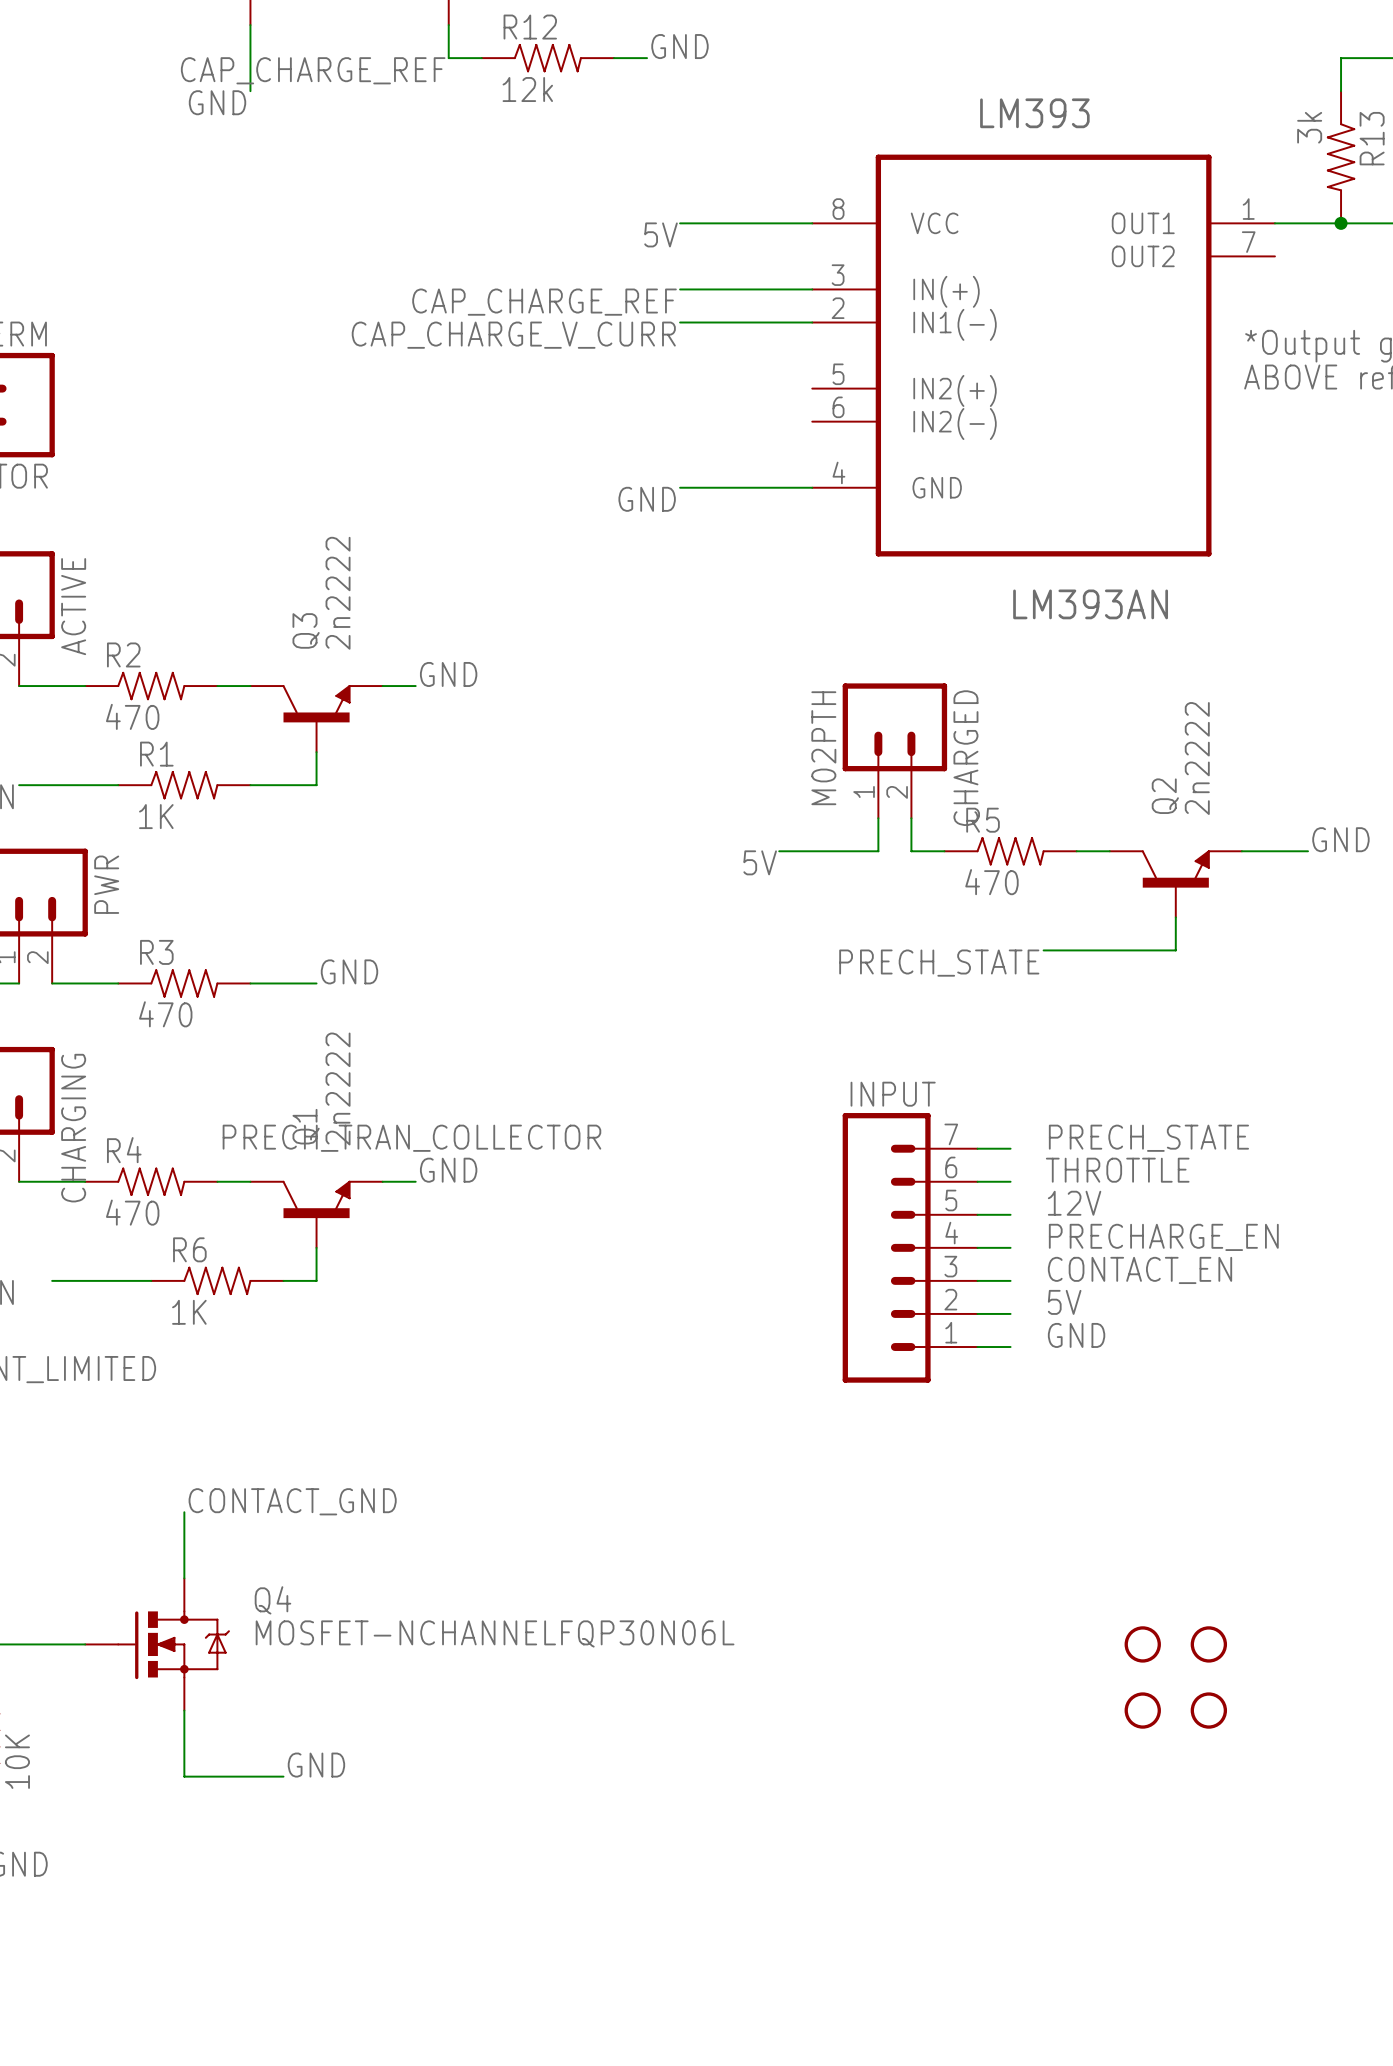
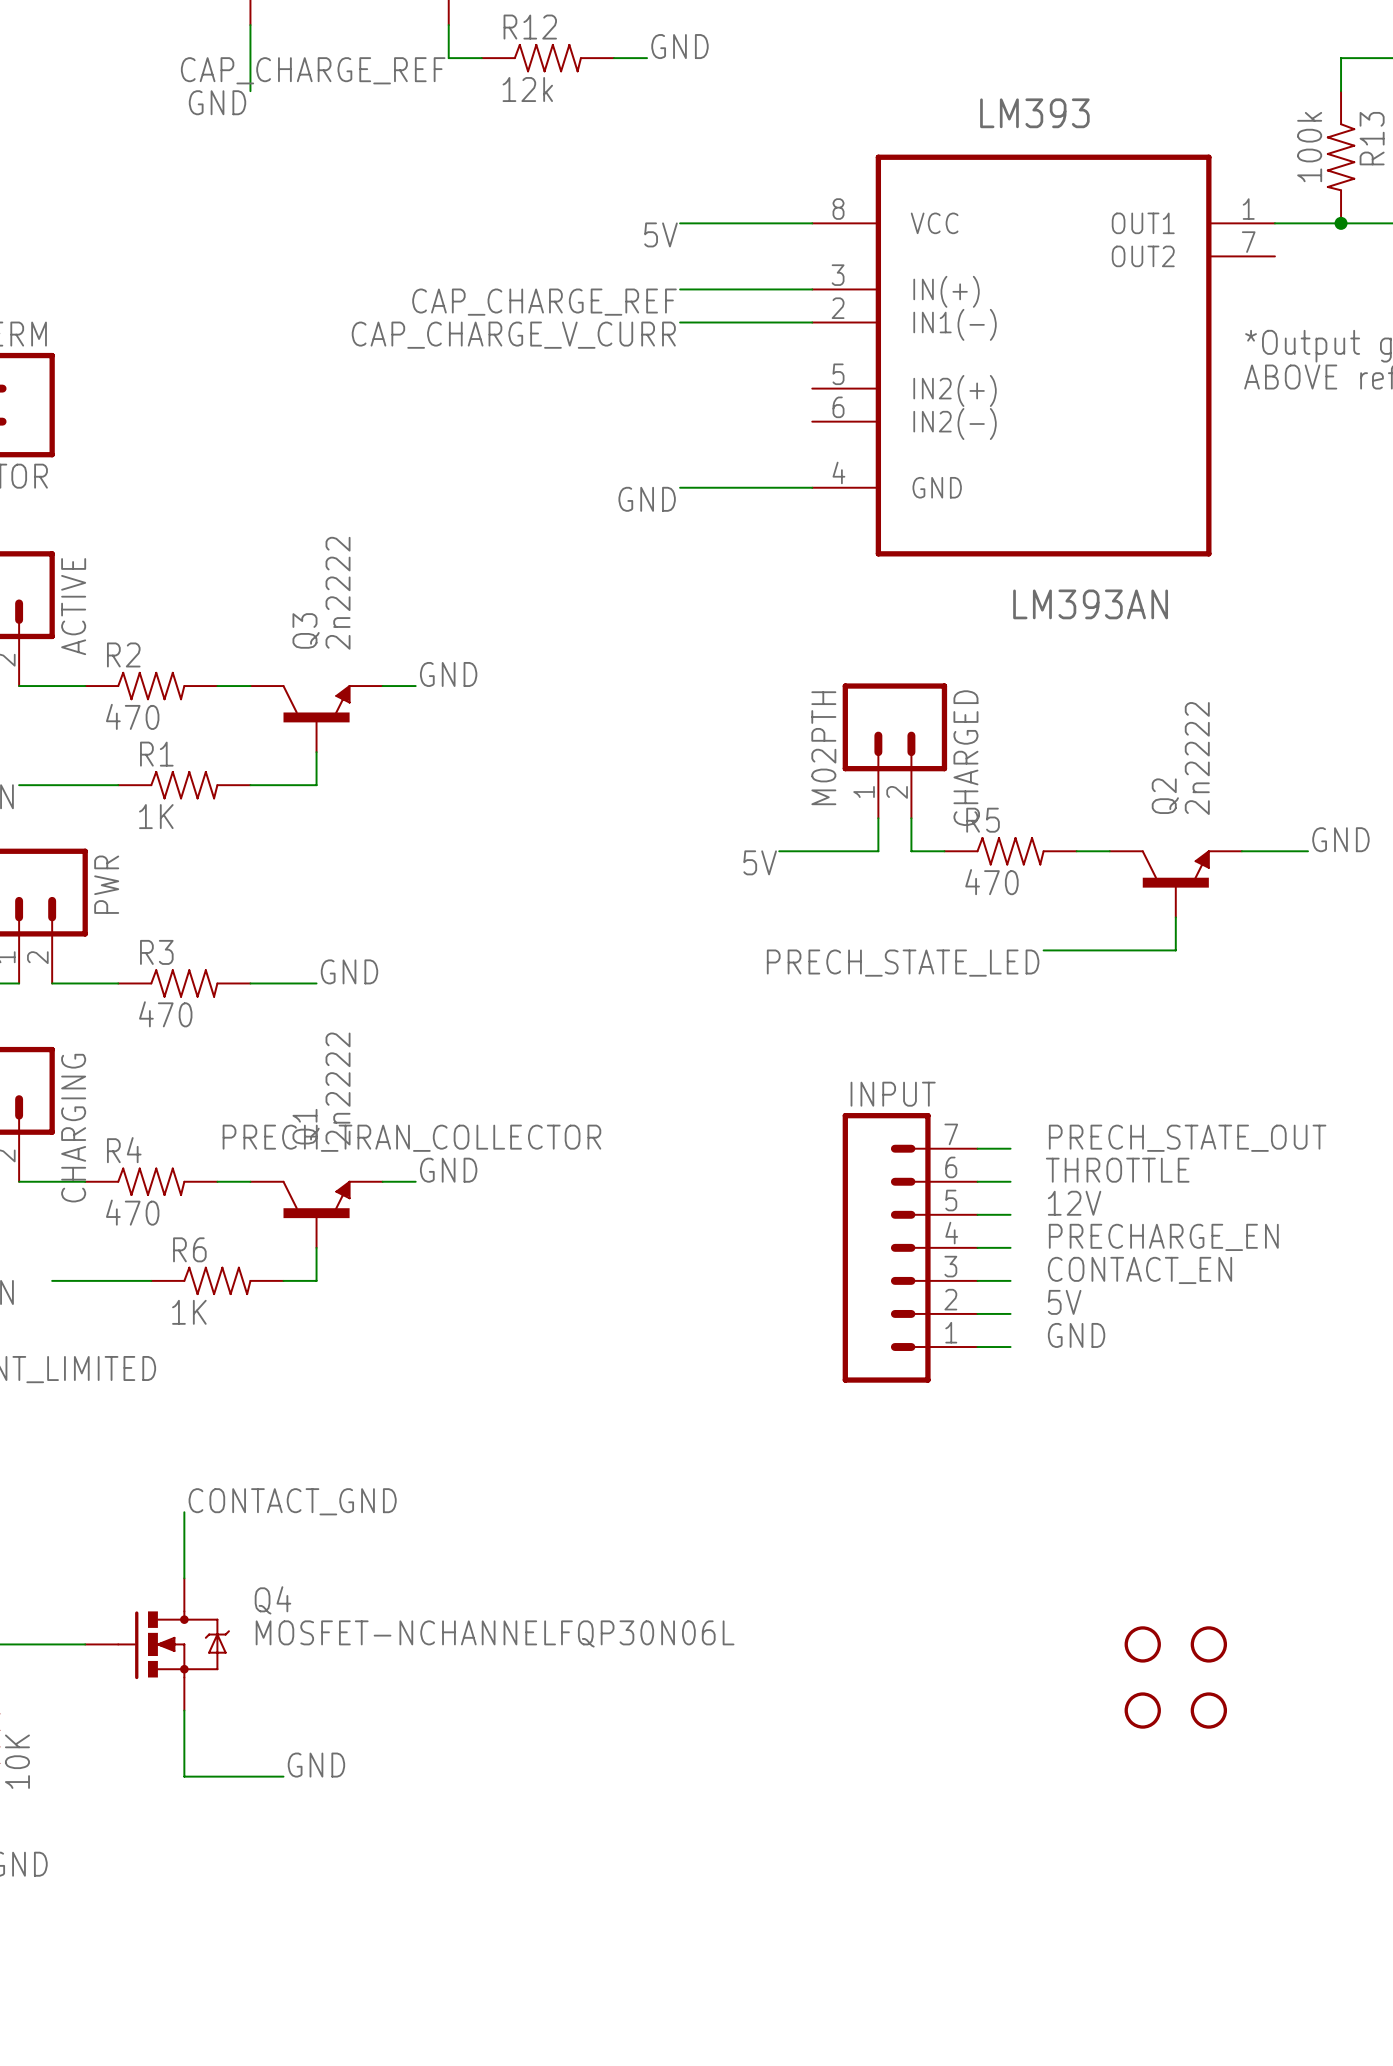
R13 value: 3k (1309, 127) -> 100k (1309, 147)
label: PRECH_STATE (939, 963) -> PRECH_STATE_LED (903, 963)
label: PRECH_STATE (1148, 1138) -> PRECH_STATE_OUT (1187, 1138)

